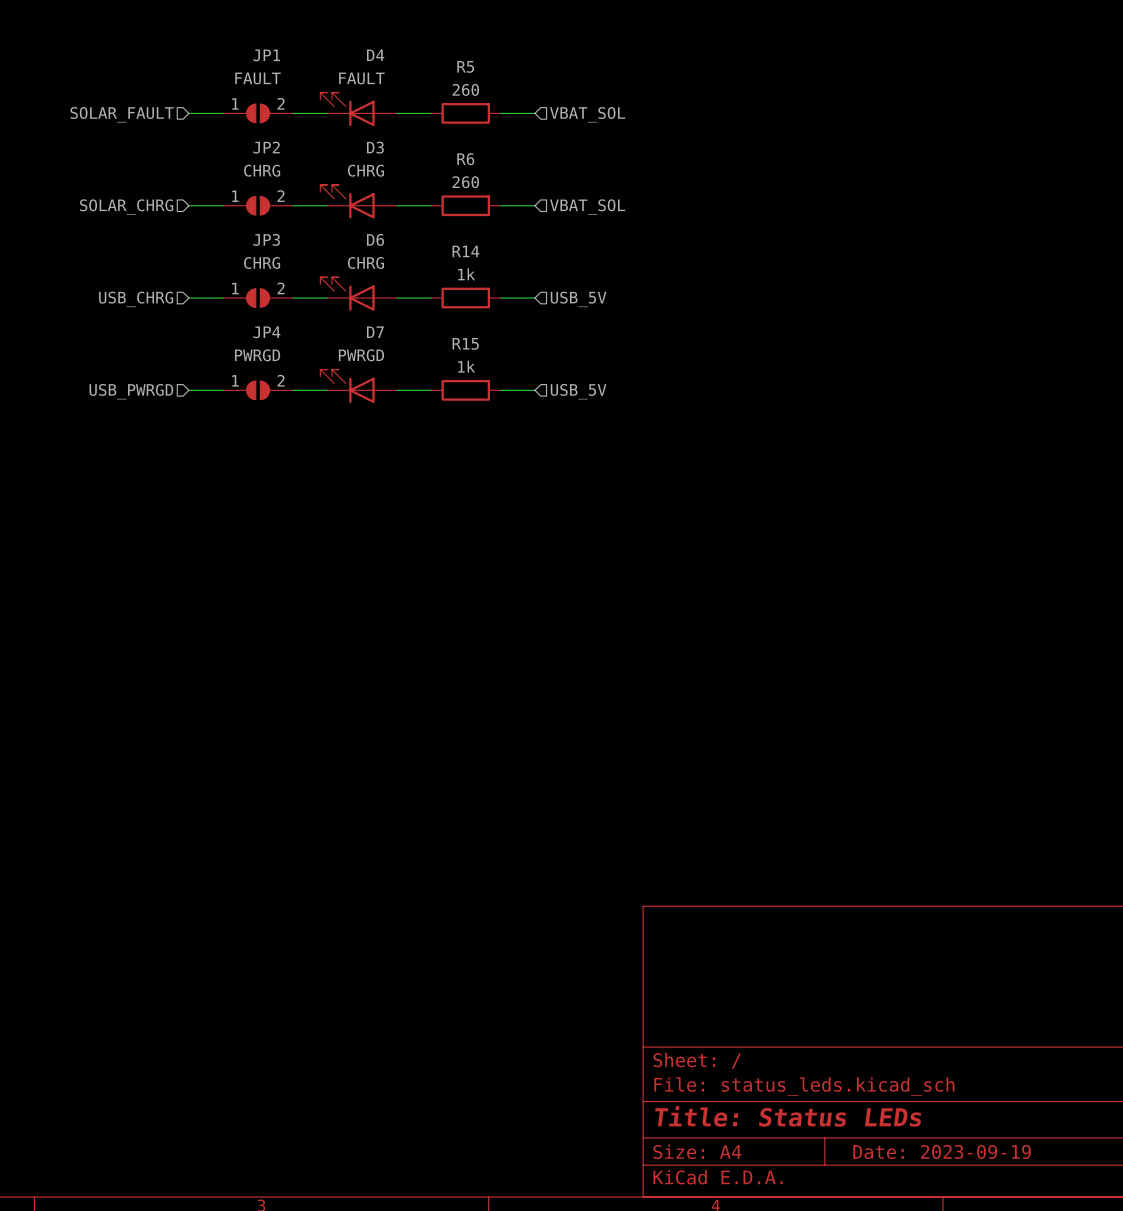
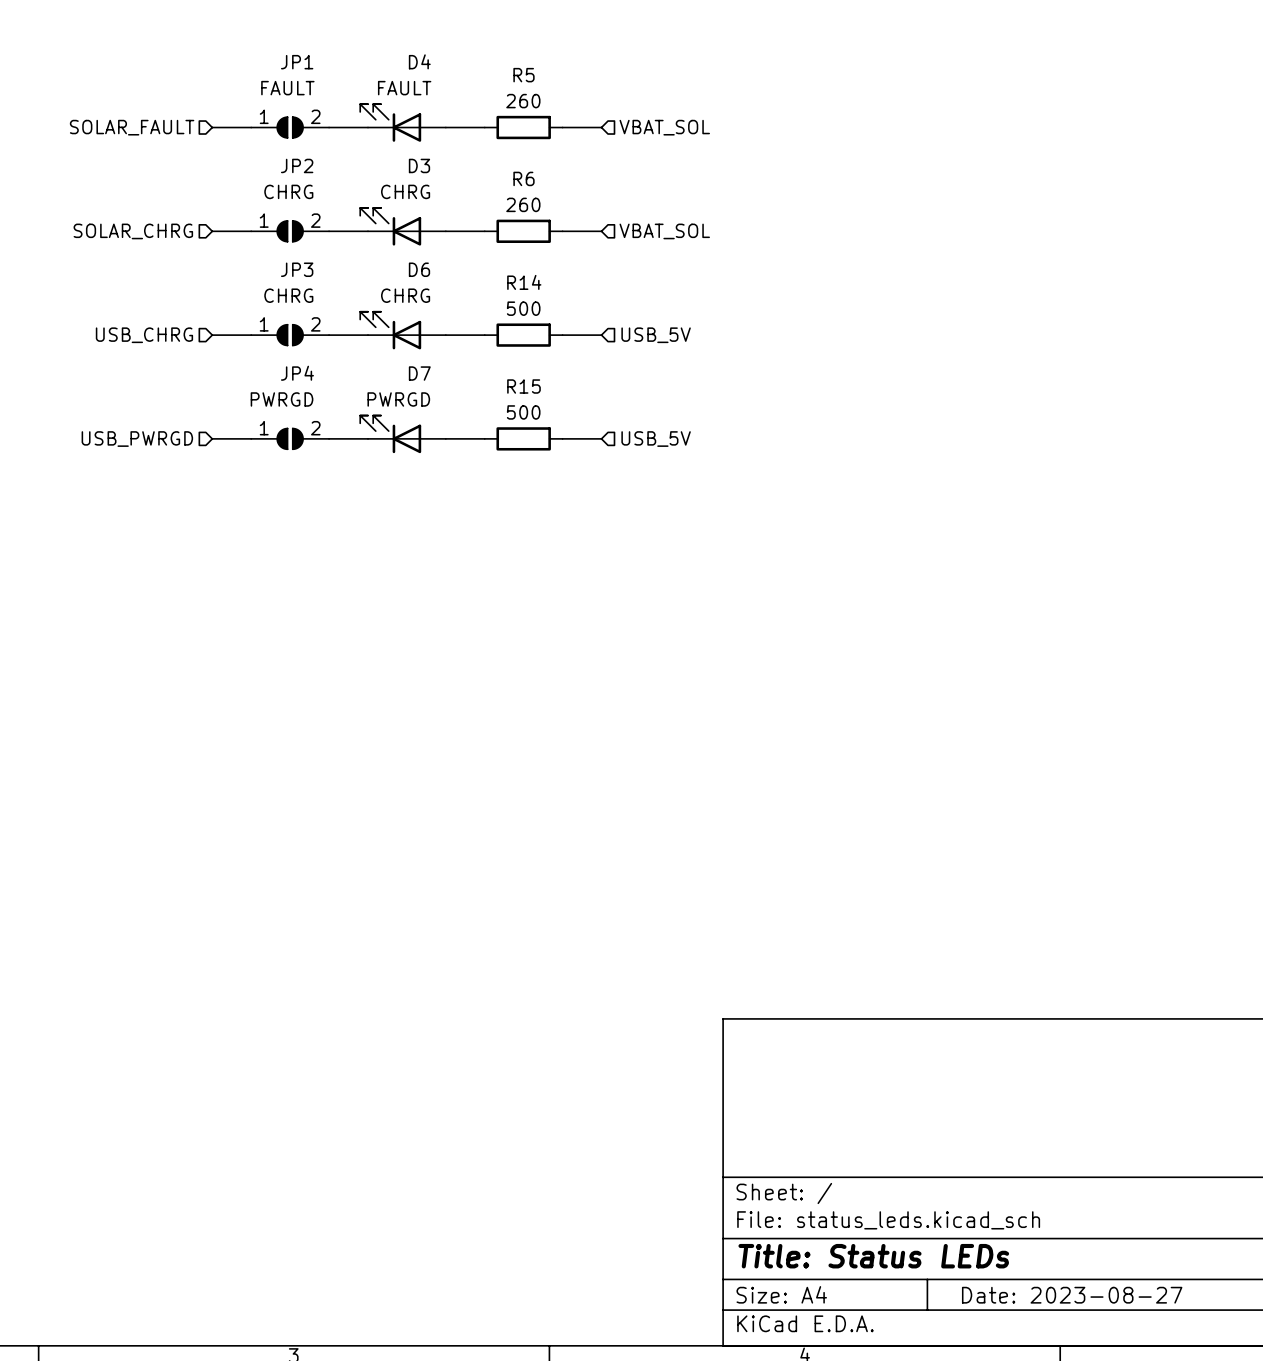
R14 value: 1k (466, 274) -> 500 (523, 308)
R15 value: 1k (466, 366) -> 500 (523, 412)
title block: Date: 2023-09-19 (942, 1151) -> Date: 2023-08-27 (1072, 1295)

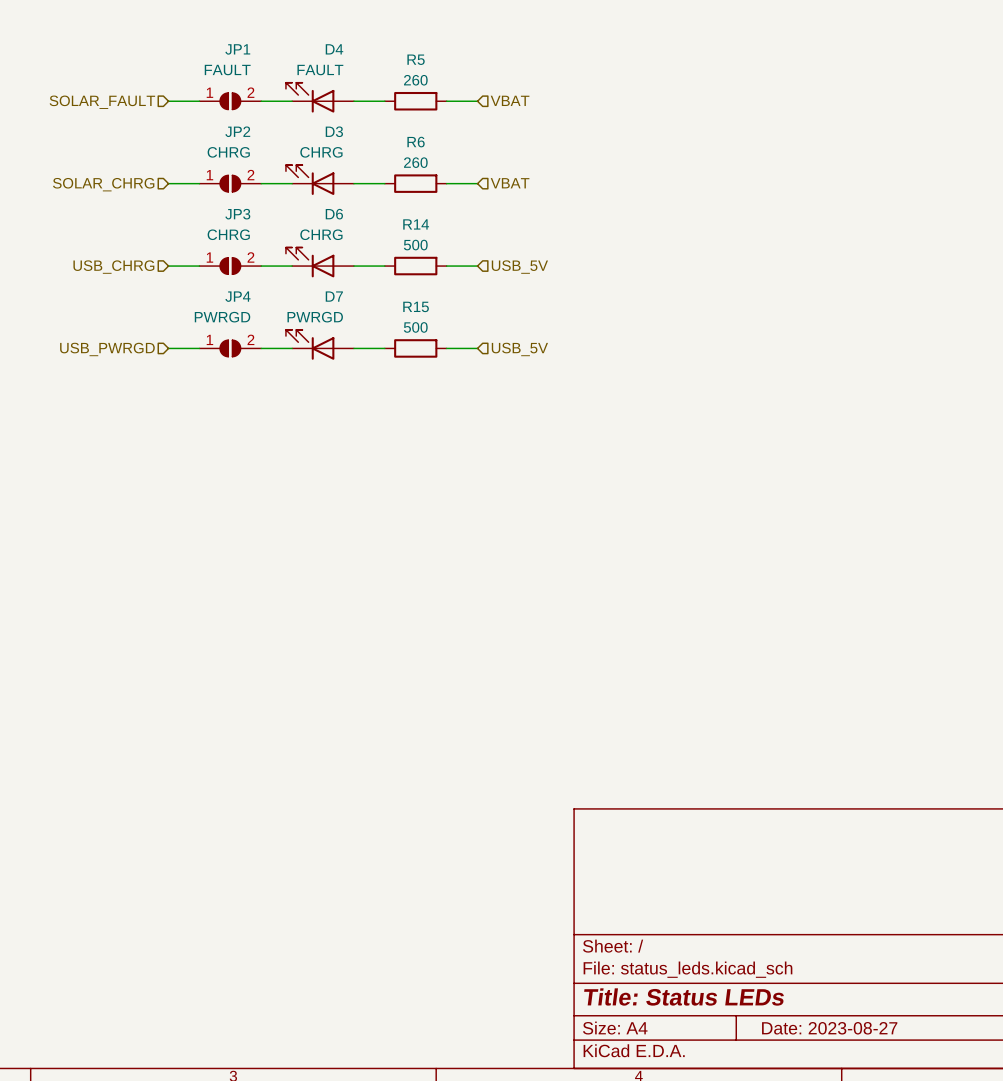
hierarchical label: VBAT_SOL (664, 127) -> VBAT (510, 100)
hierarchical label: VBAT_SOL (664, 231) -> VBAT (510, 183)

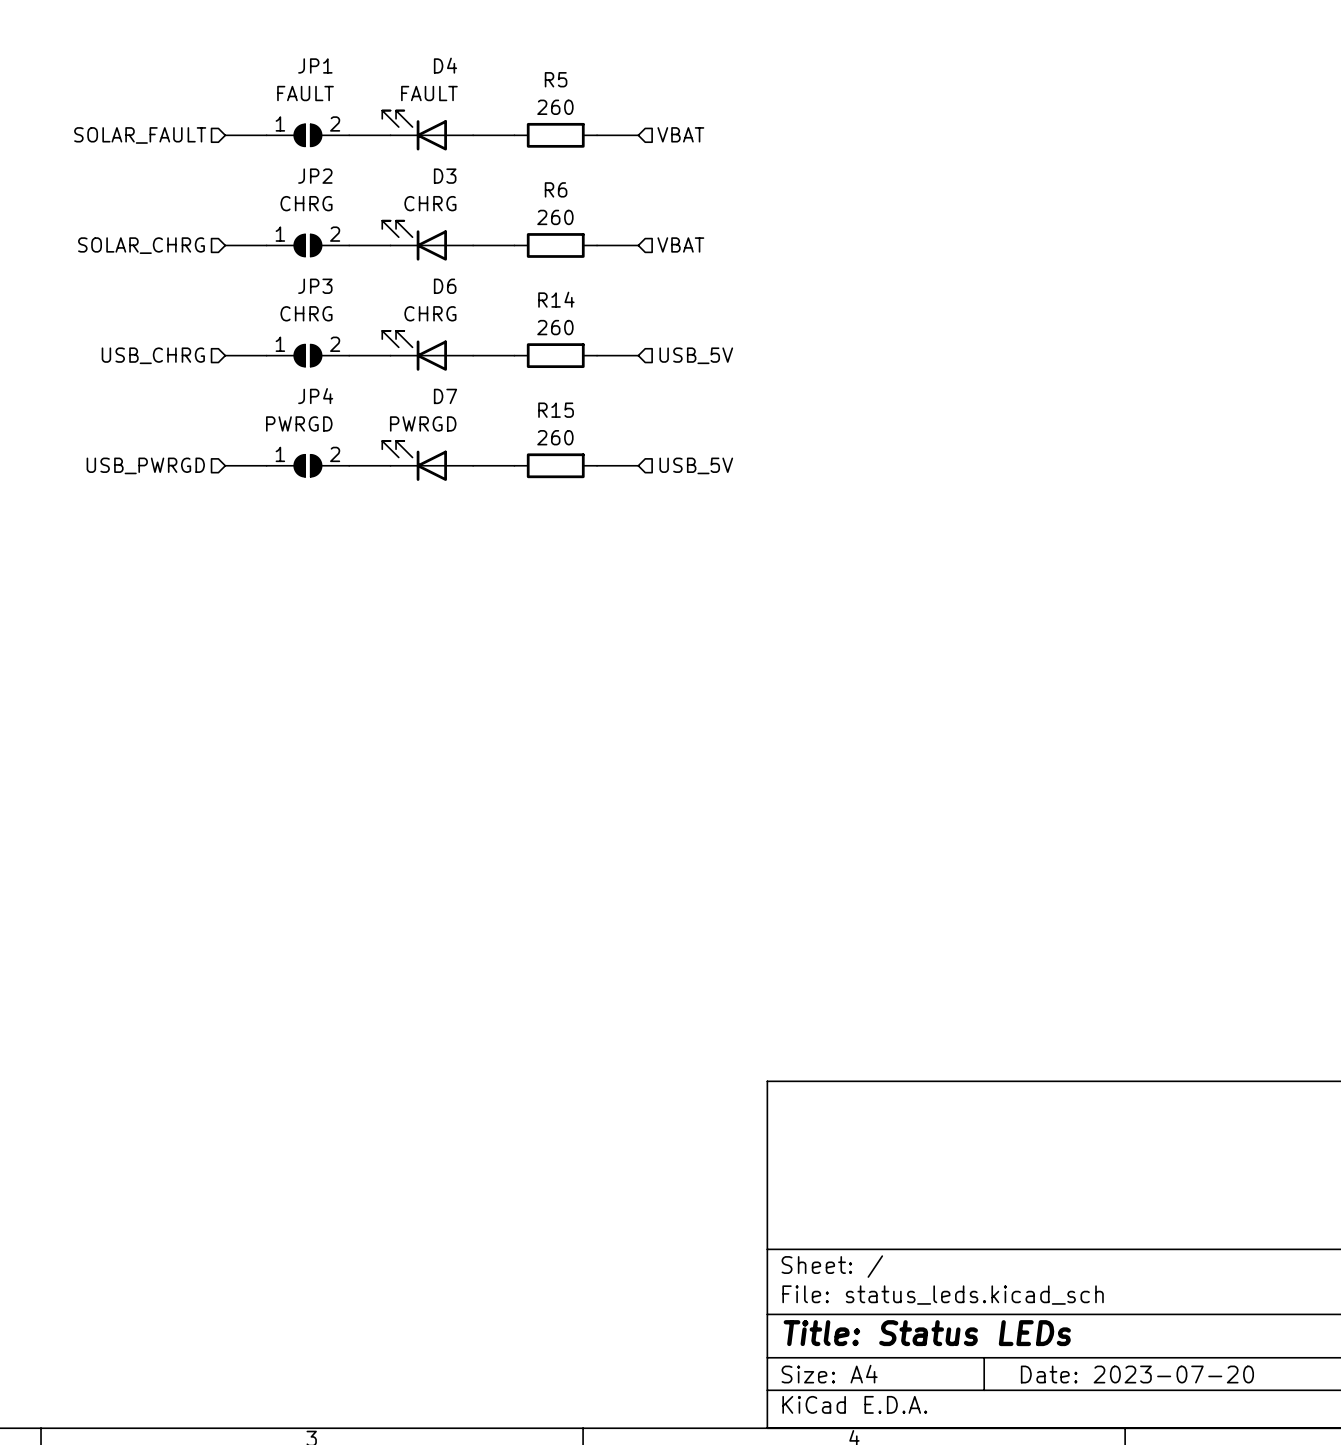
R14 value: 500 (415, 245) -> 260 (555, 327)
R15 value: 500 (415, 327) -> 260 (555, 437)
title block: Date: 2023-08-27 (829, 1028) -> Date: 2023-07-20 (1137, 1374)

